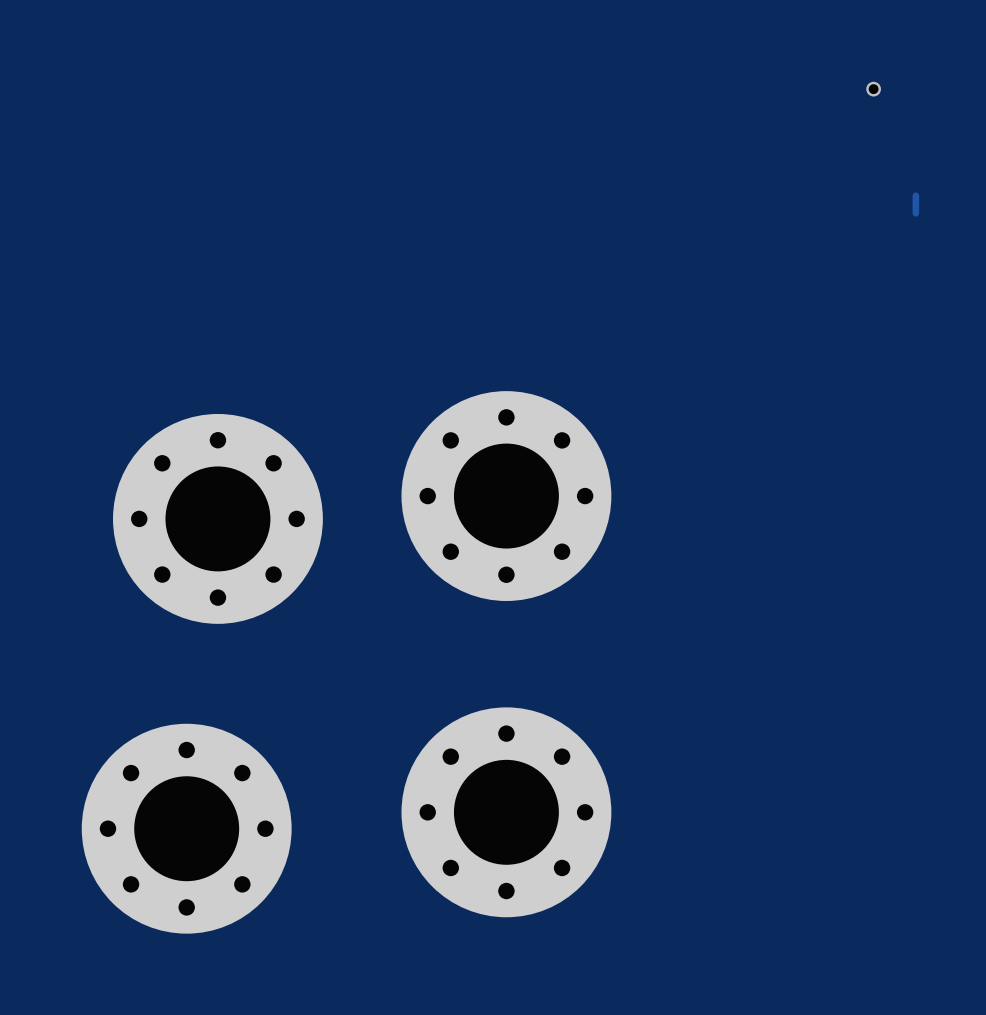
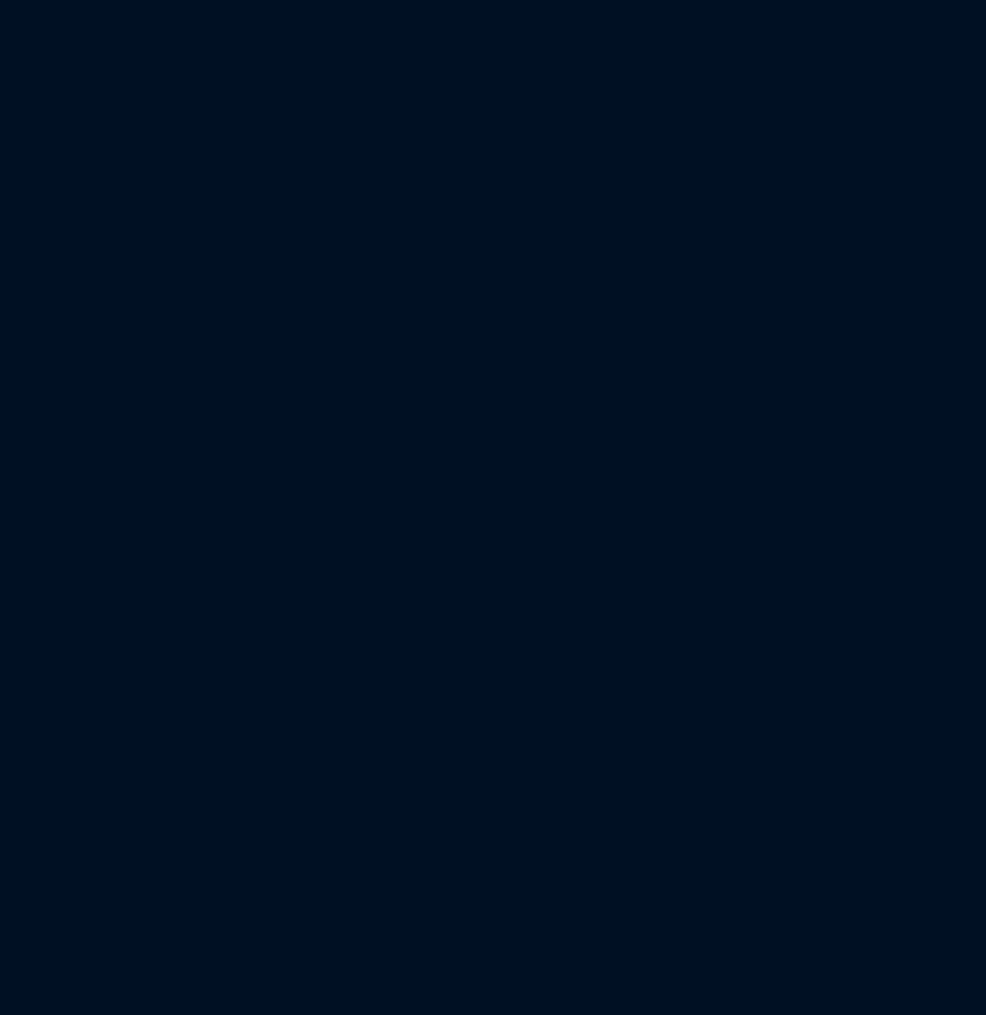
via: (873, 89) -> none
track: (915, 195) (915, 213) -> none
part: (506, 496) -> none
part: (217, 518) -> none
part: (506, 812) -> none
part: (186, 828) -> none

